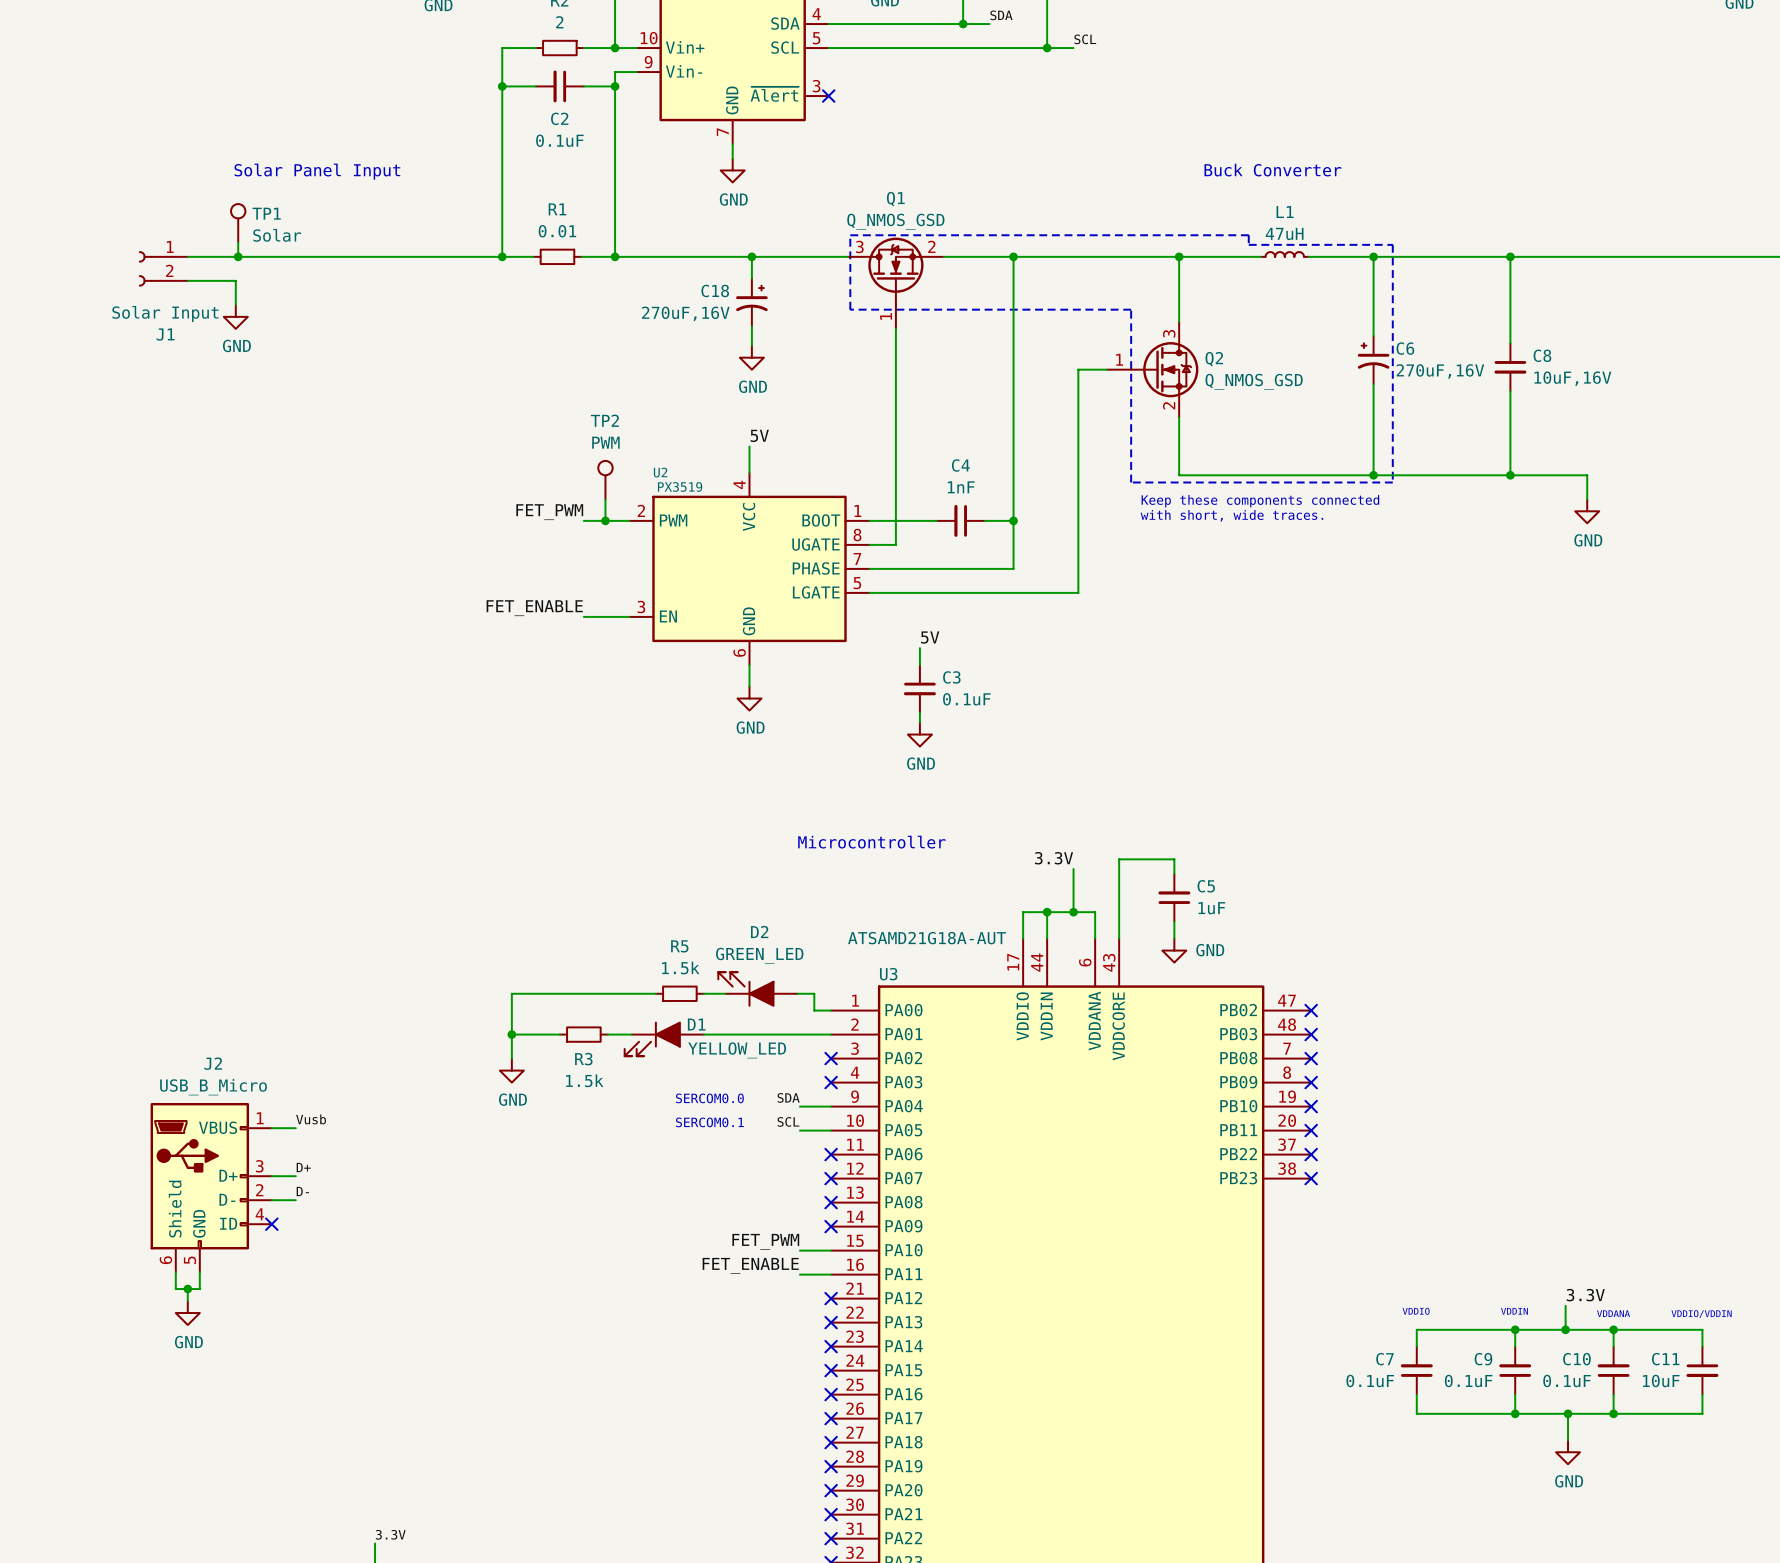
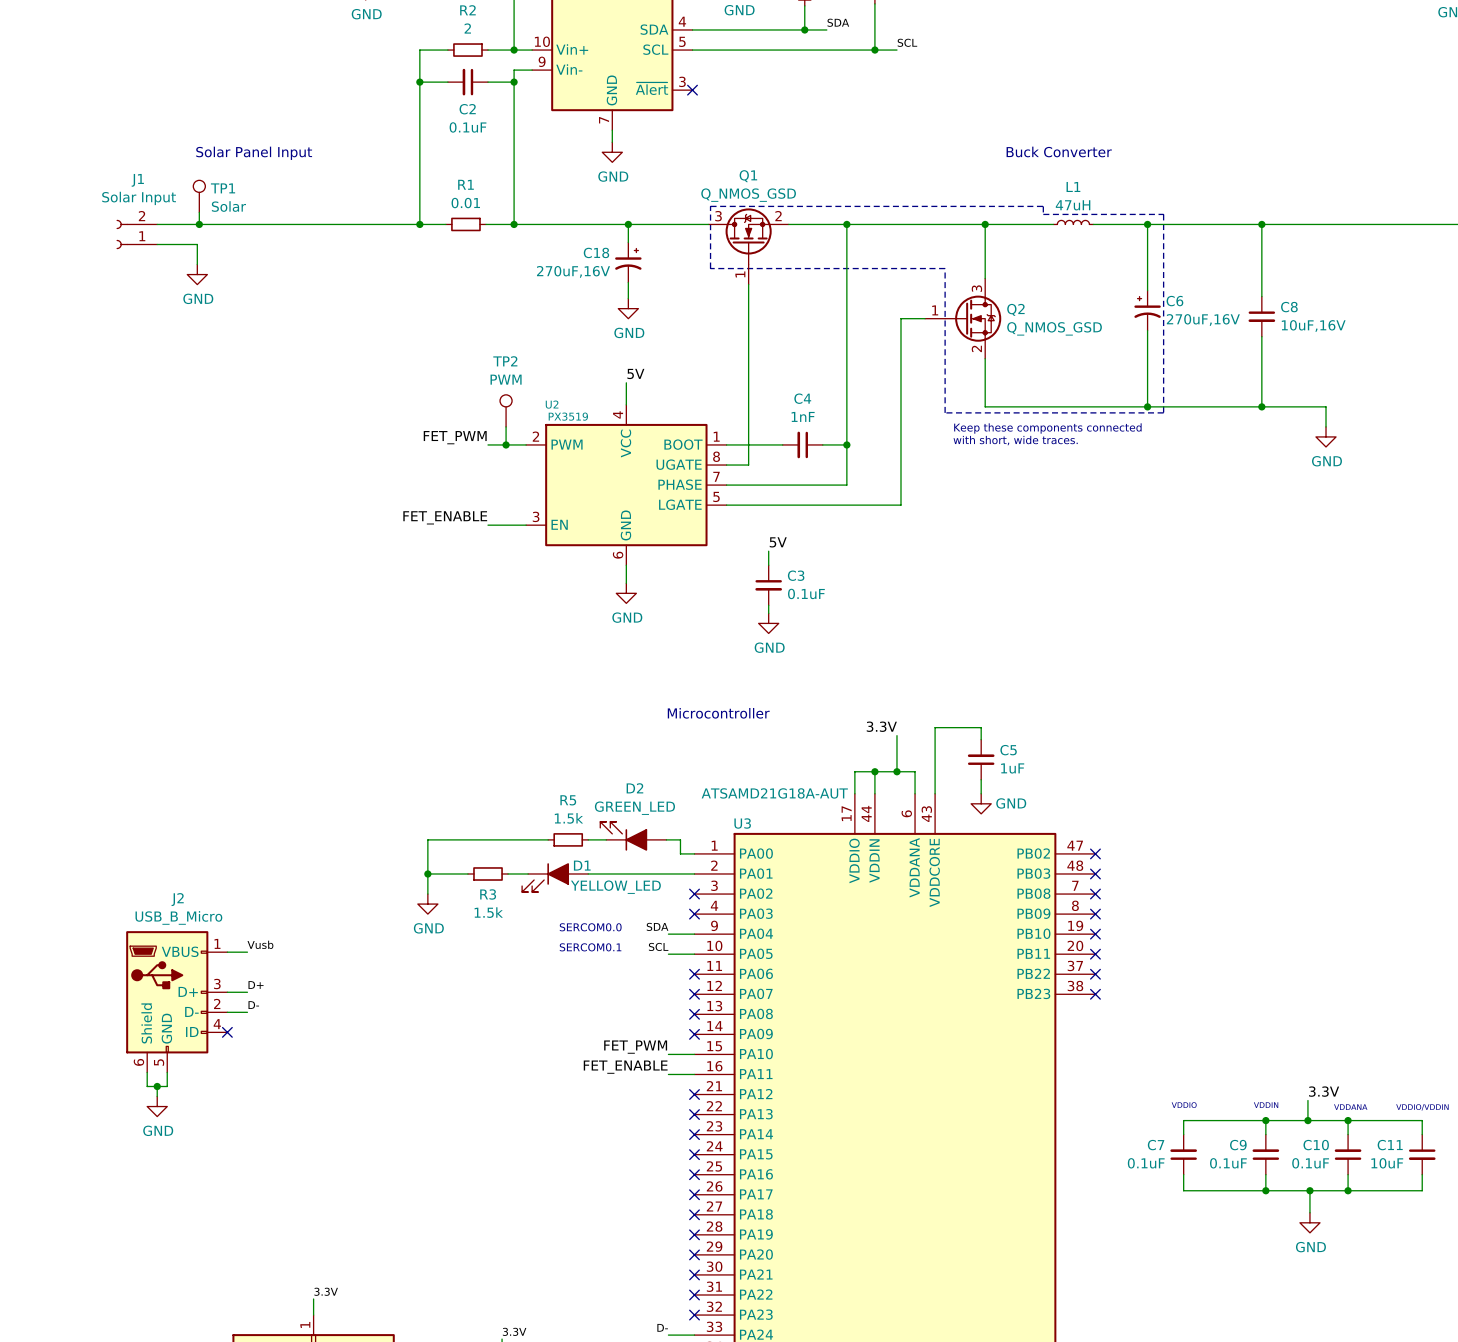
J1 flip: as is (145, 268) -> up-down (122, 234)

